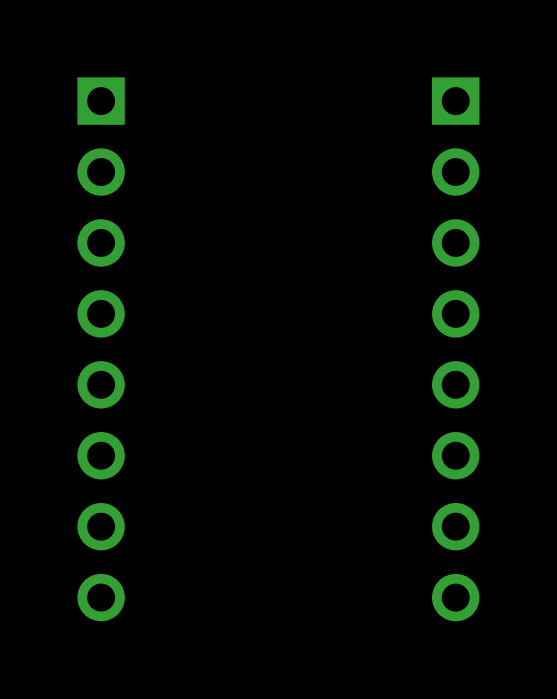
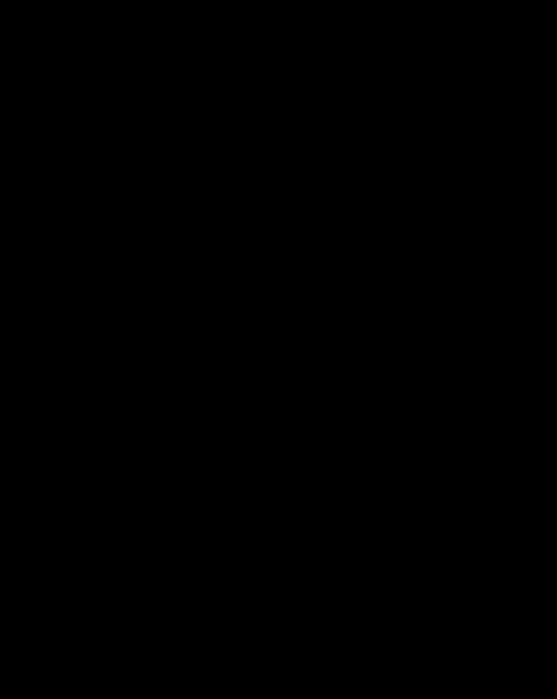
part: (101, 349) -> none
part: (455, 349) -> none

